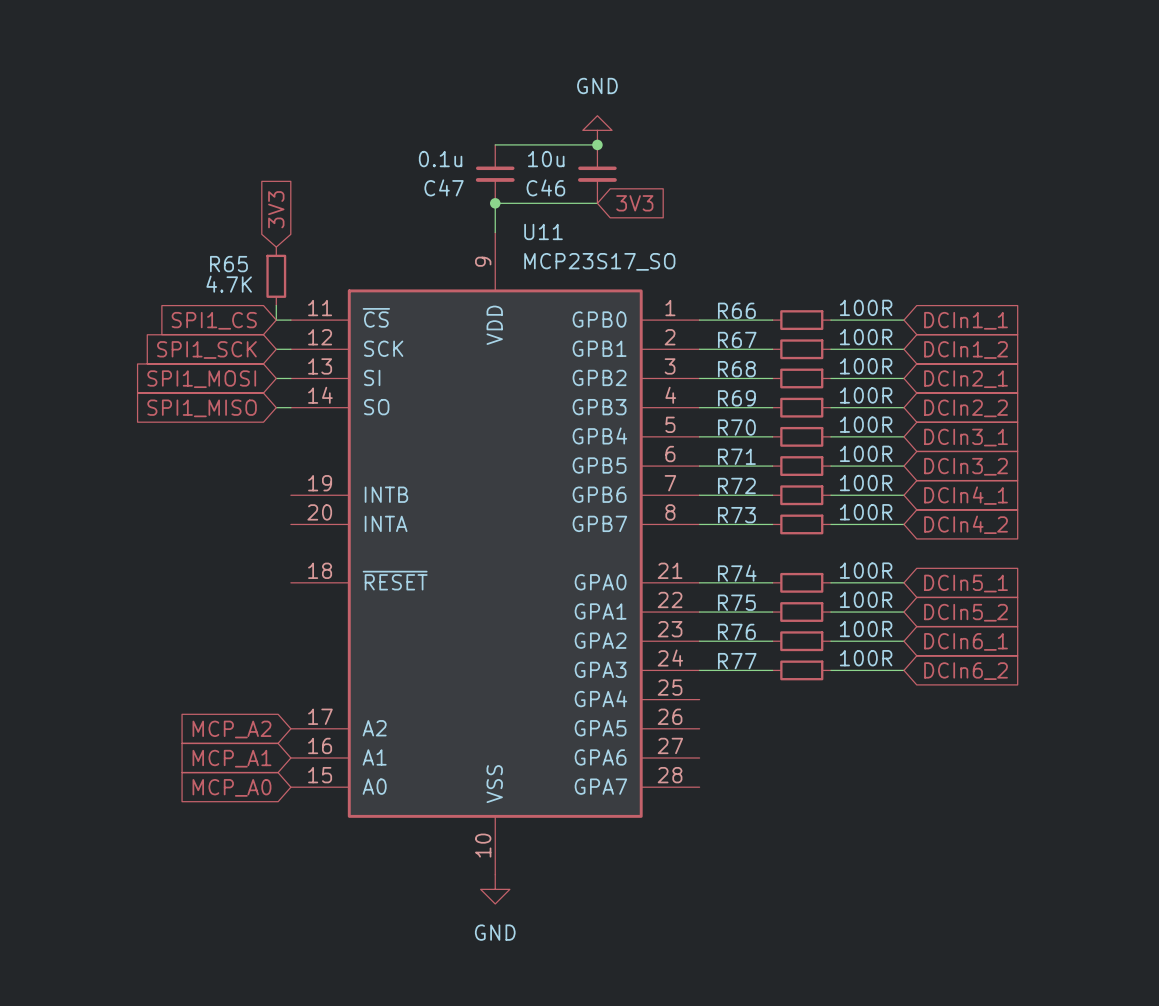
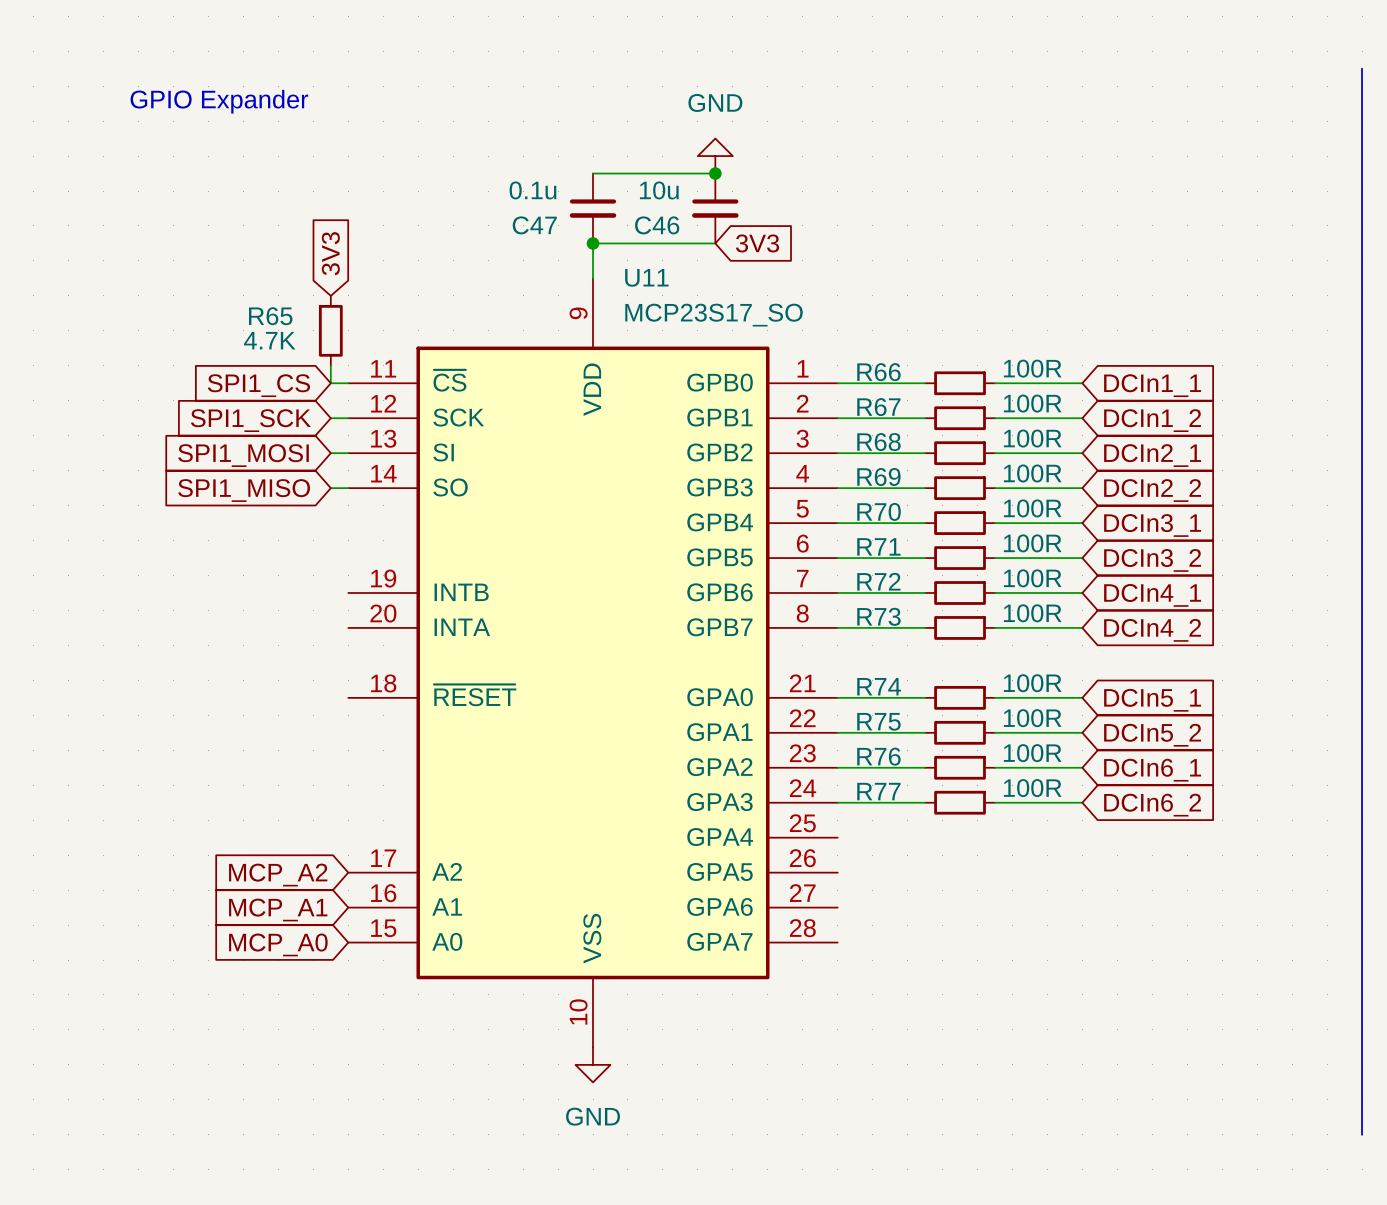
line: none -> (1362, 68) (1362, 1134)
text: none -> GPIO Expander (219, 101)

